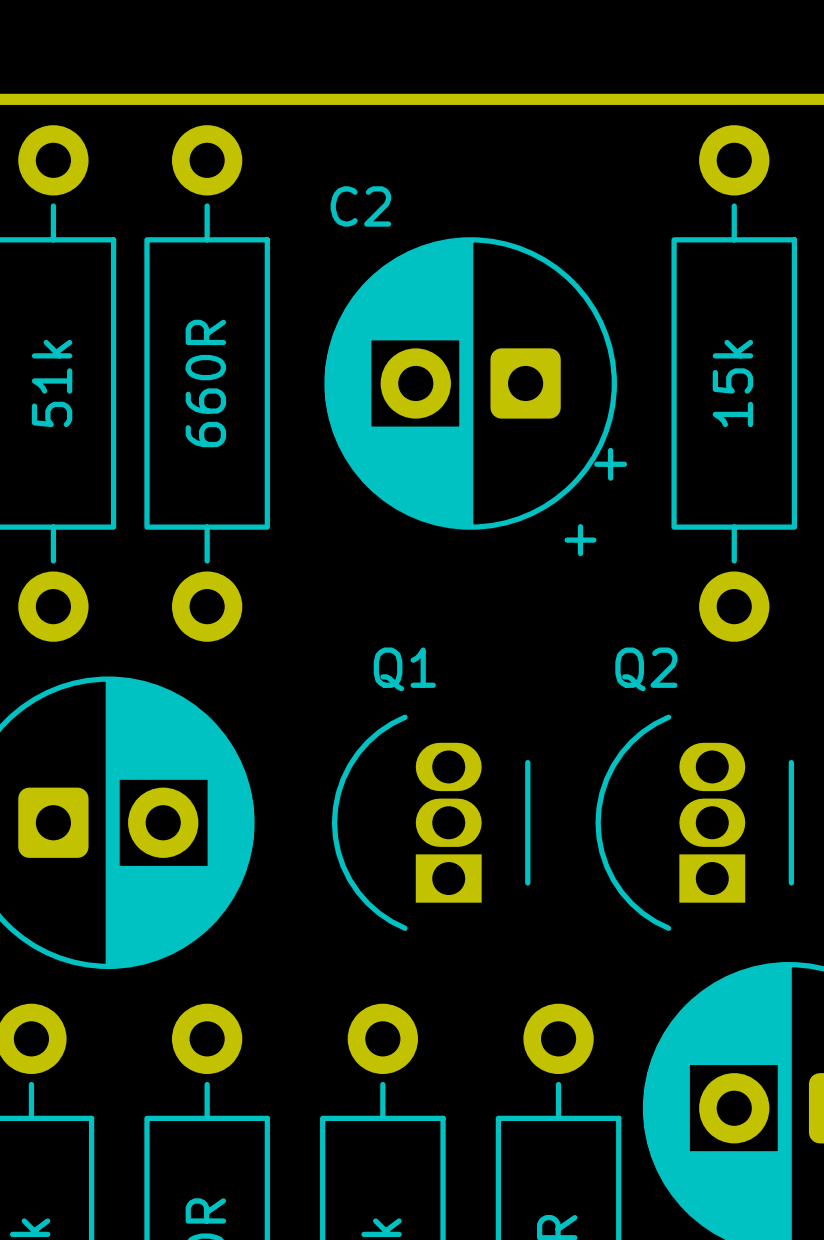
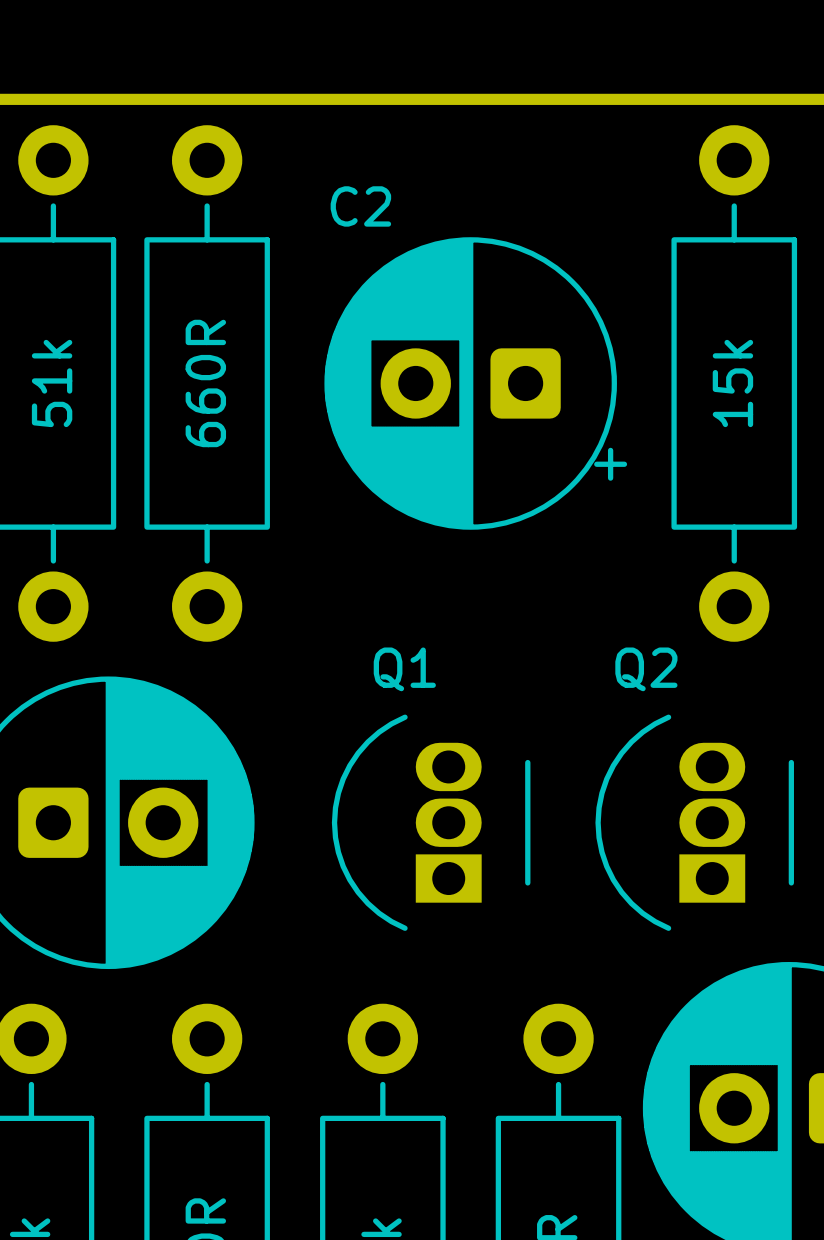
text: + (580, 540) -> none

